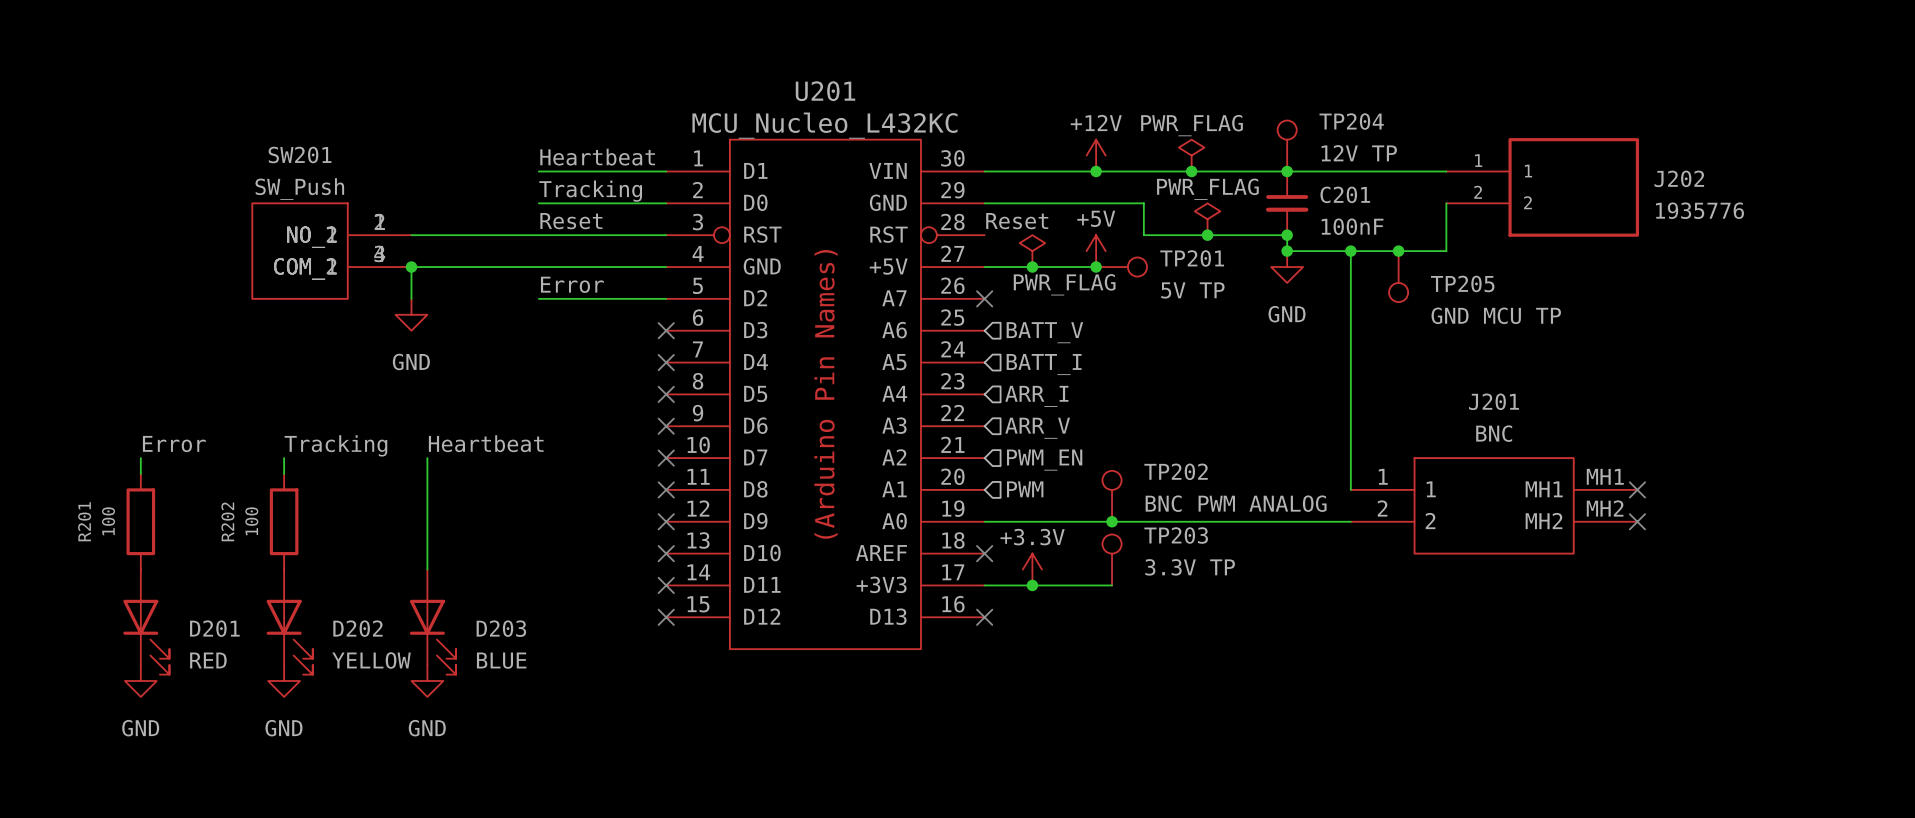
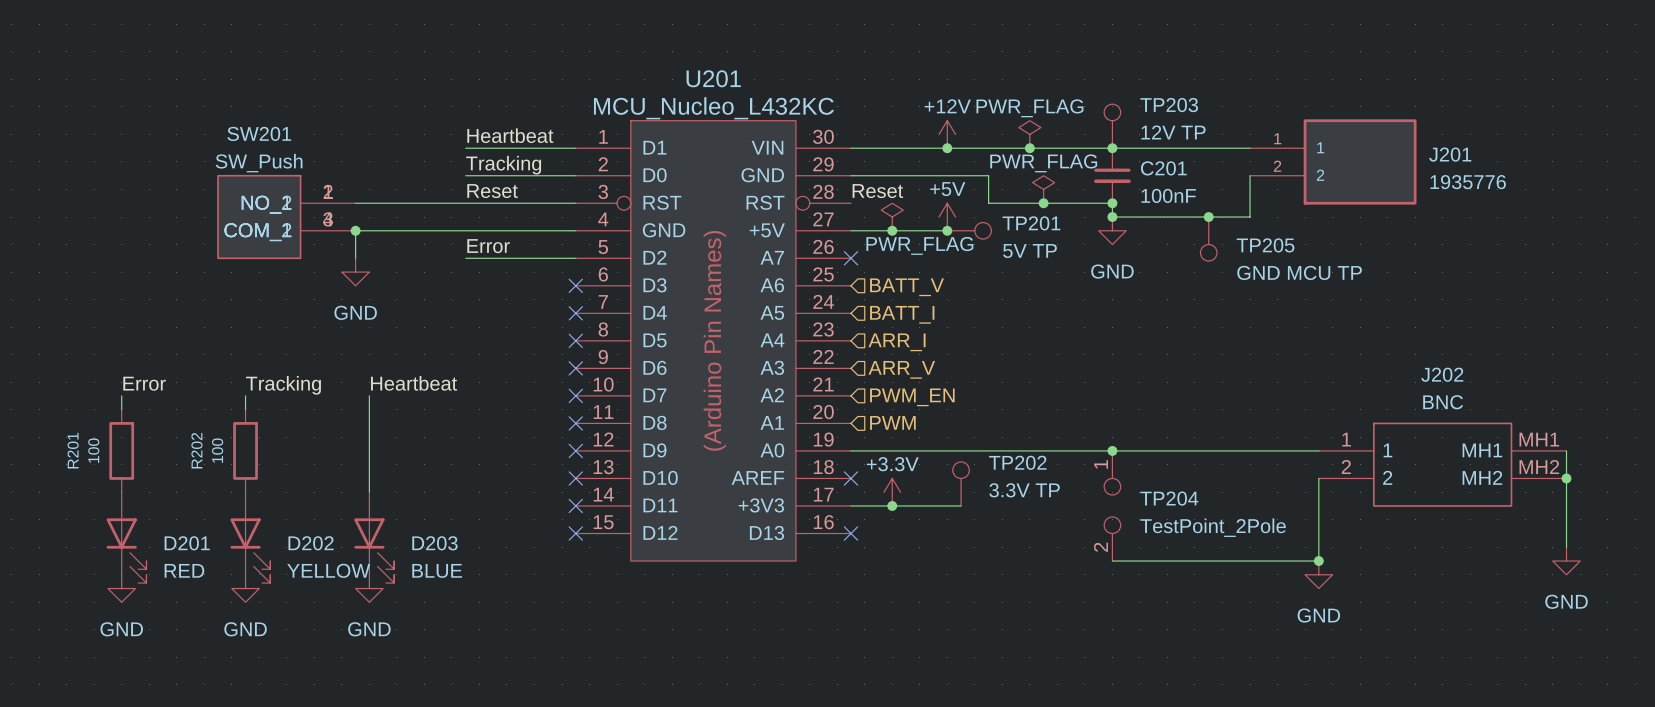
TP204 name: TP204 (1351, 121) -> TP203 (1169, 105)
J202 name: J202 (1679, 178) -> J201 (1450, 154)
wire: (1350, 251) (1350, 489) -> none
junction: (1350, 251) -> none
no-connect mark: (1637, 489) -> none
TP202: BNC PWM ANALOG (1112, 496) -> none
J201: BNC (1494, 505) -> none
junction: (1112, 521) -> none
junction: none -> (1112, 450)
wire: none -> (1167, 450) (1318, 450)
no-connect mark: (1637, 521) -> none
wire: none -> (1566, 450) (1566, 547)
TP203 name: TP203 (1176, 535) -> TP202 (1017, 462)
J202: none -> BNC (1442, 464)
wire: none -> (1318, 478) (1318, 561) (1112, 561)
junction: none -> (1566, 478)
TP204: none -> TestPoint_2Pole (1112, 505)
junction: none -> (1318, 561)
power symbol: none -> GND (1566, 561)
power symbol: none -> GND (1318, 574)

